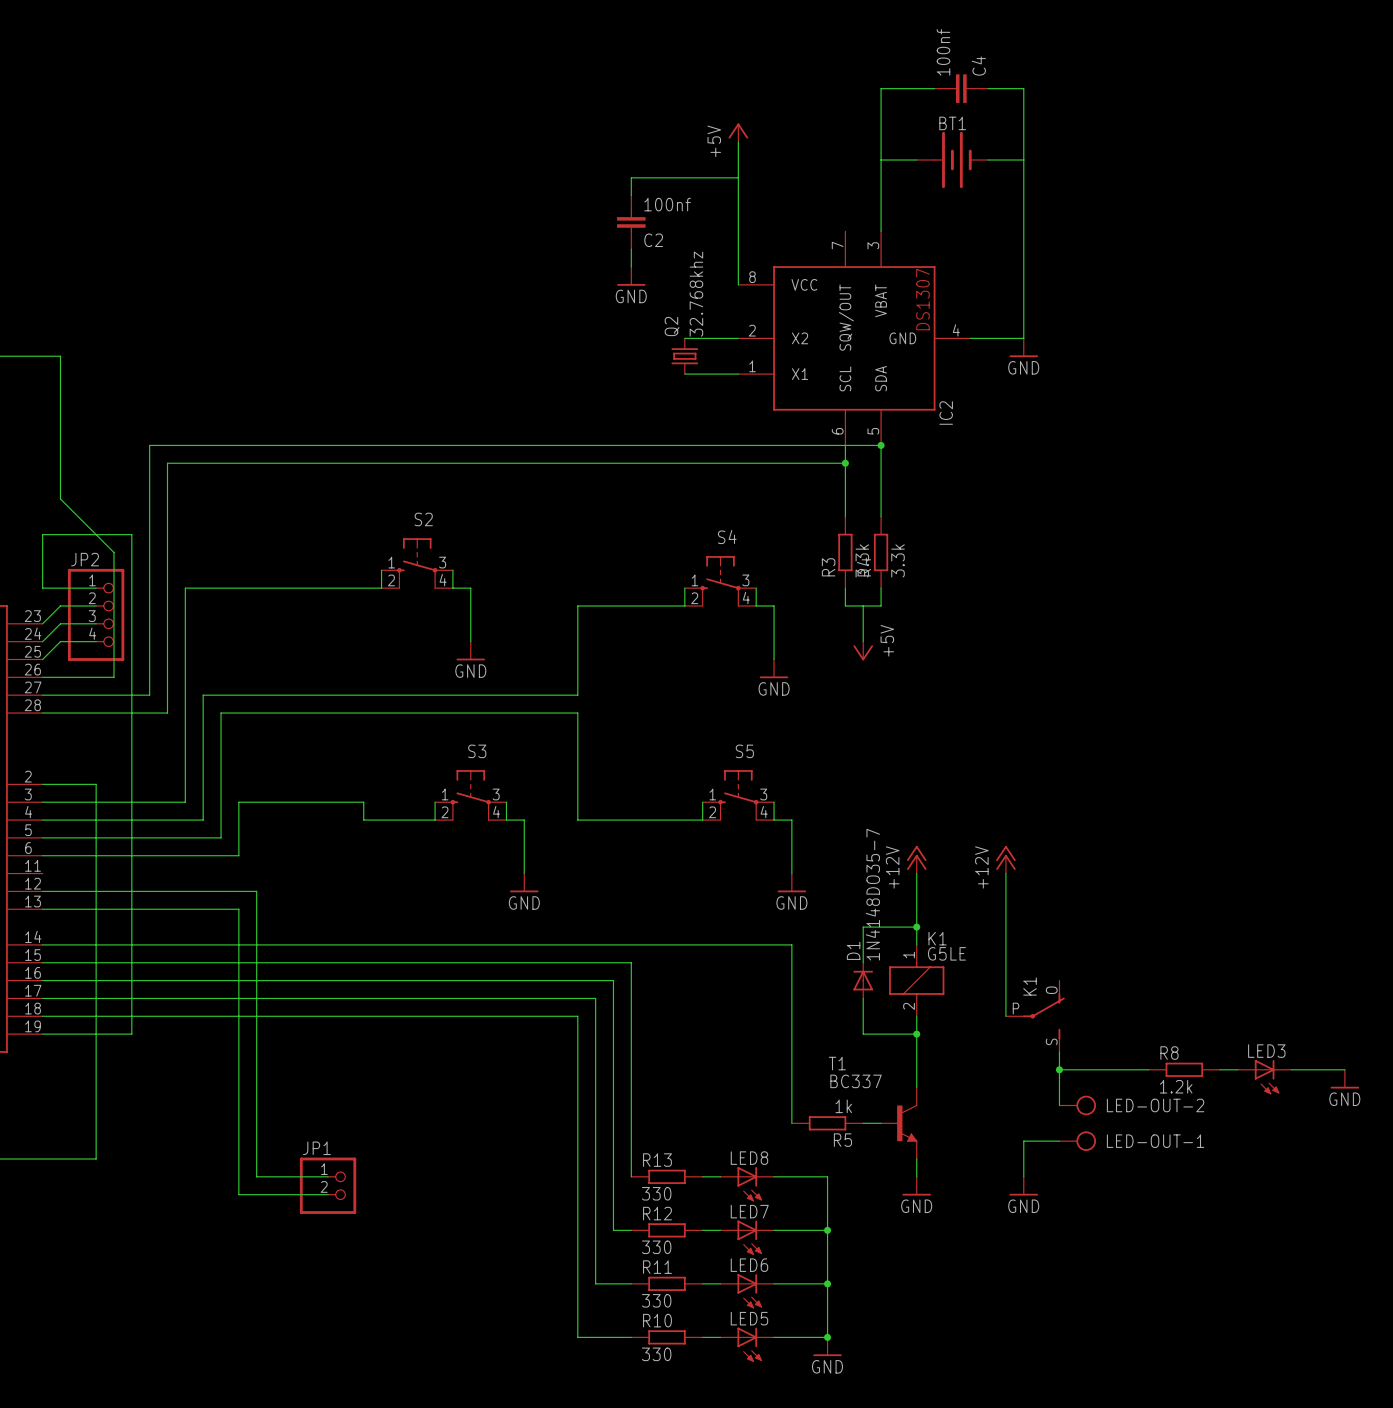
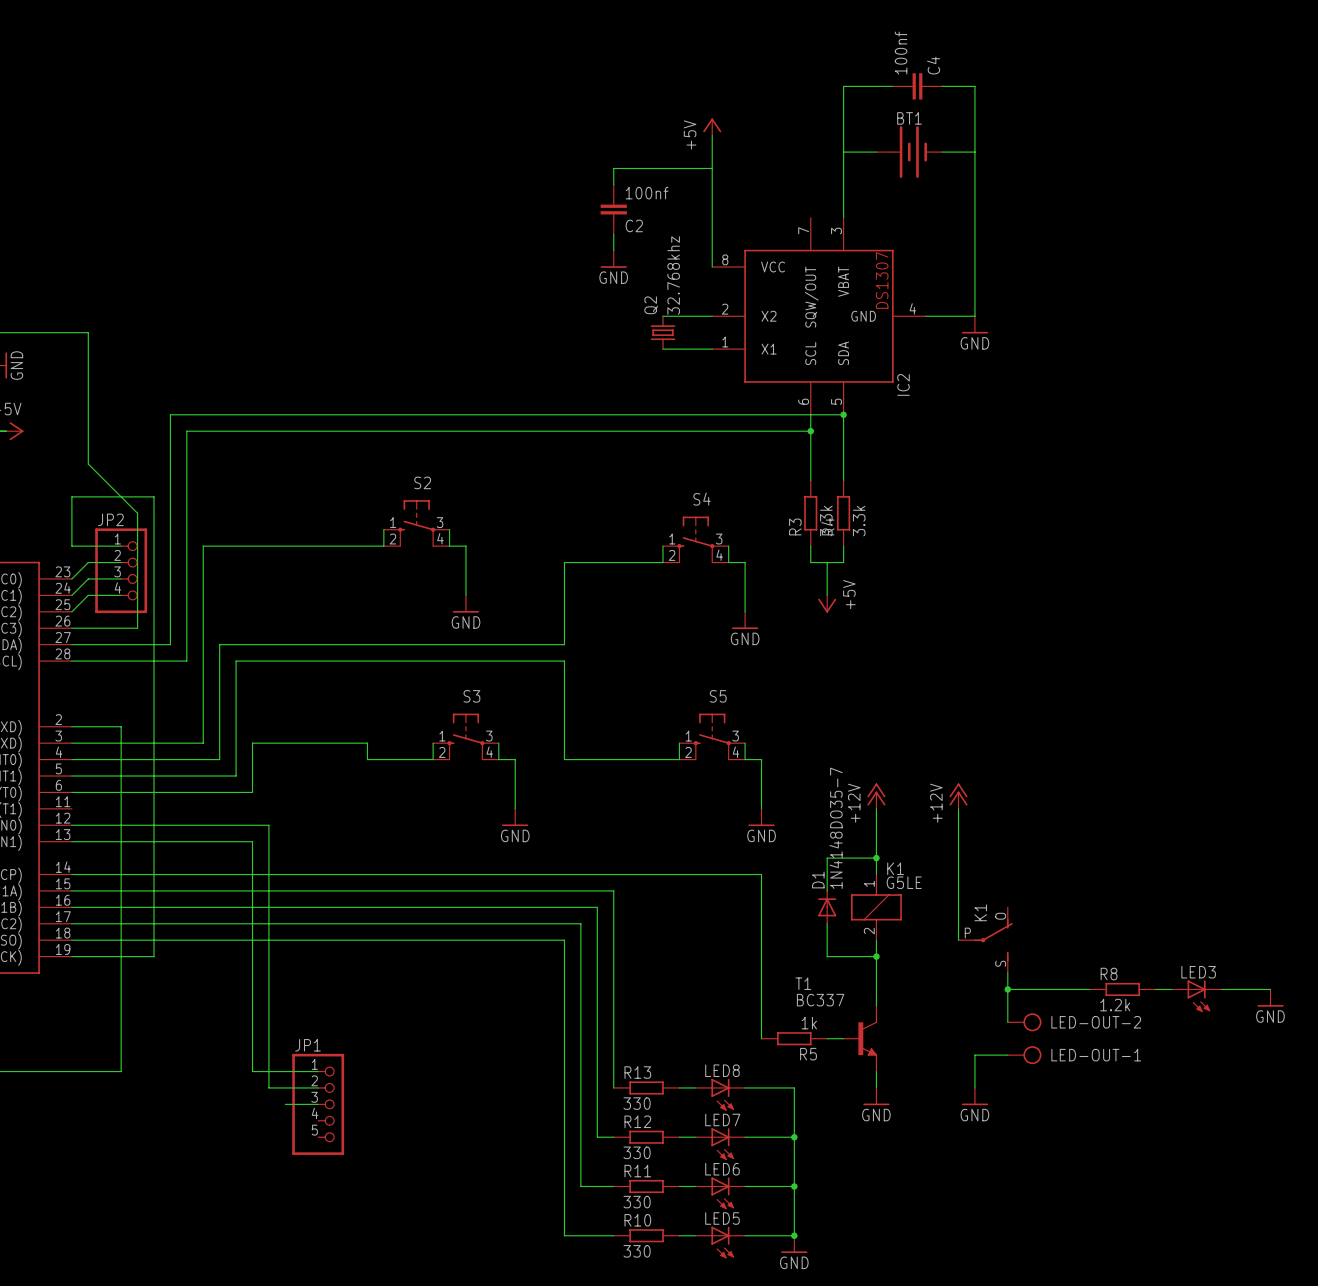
JP1 name position: JP1 (316, 1148) -> JP1 (307, 1045)
JP1 symbol: [299, 1157, 357, 1214] -> [292, 1053, 345, 1155]
wire: (238, 1158) (238, 1194) (274, 1194) -> (252, 1071) (318, 1071)
wire: (310, 1176) (328, 1176) -> none
wire: (310, 1194) (328, 1194) -> none

